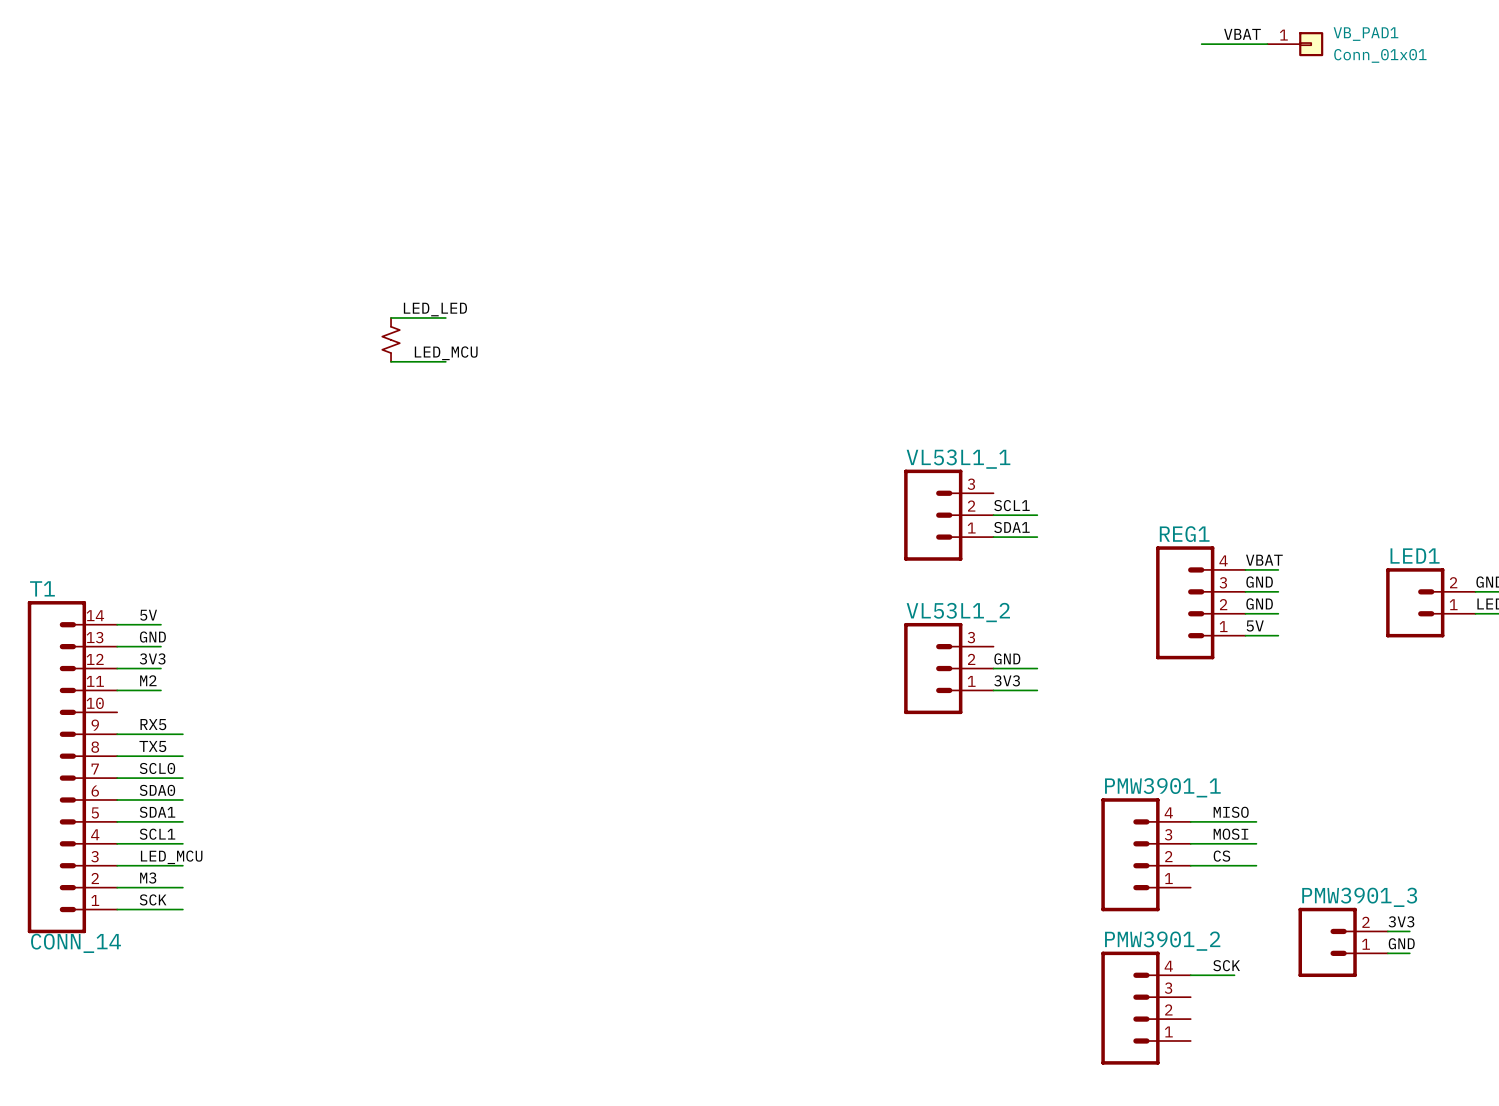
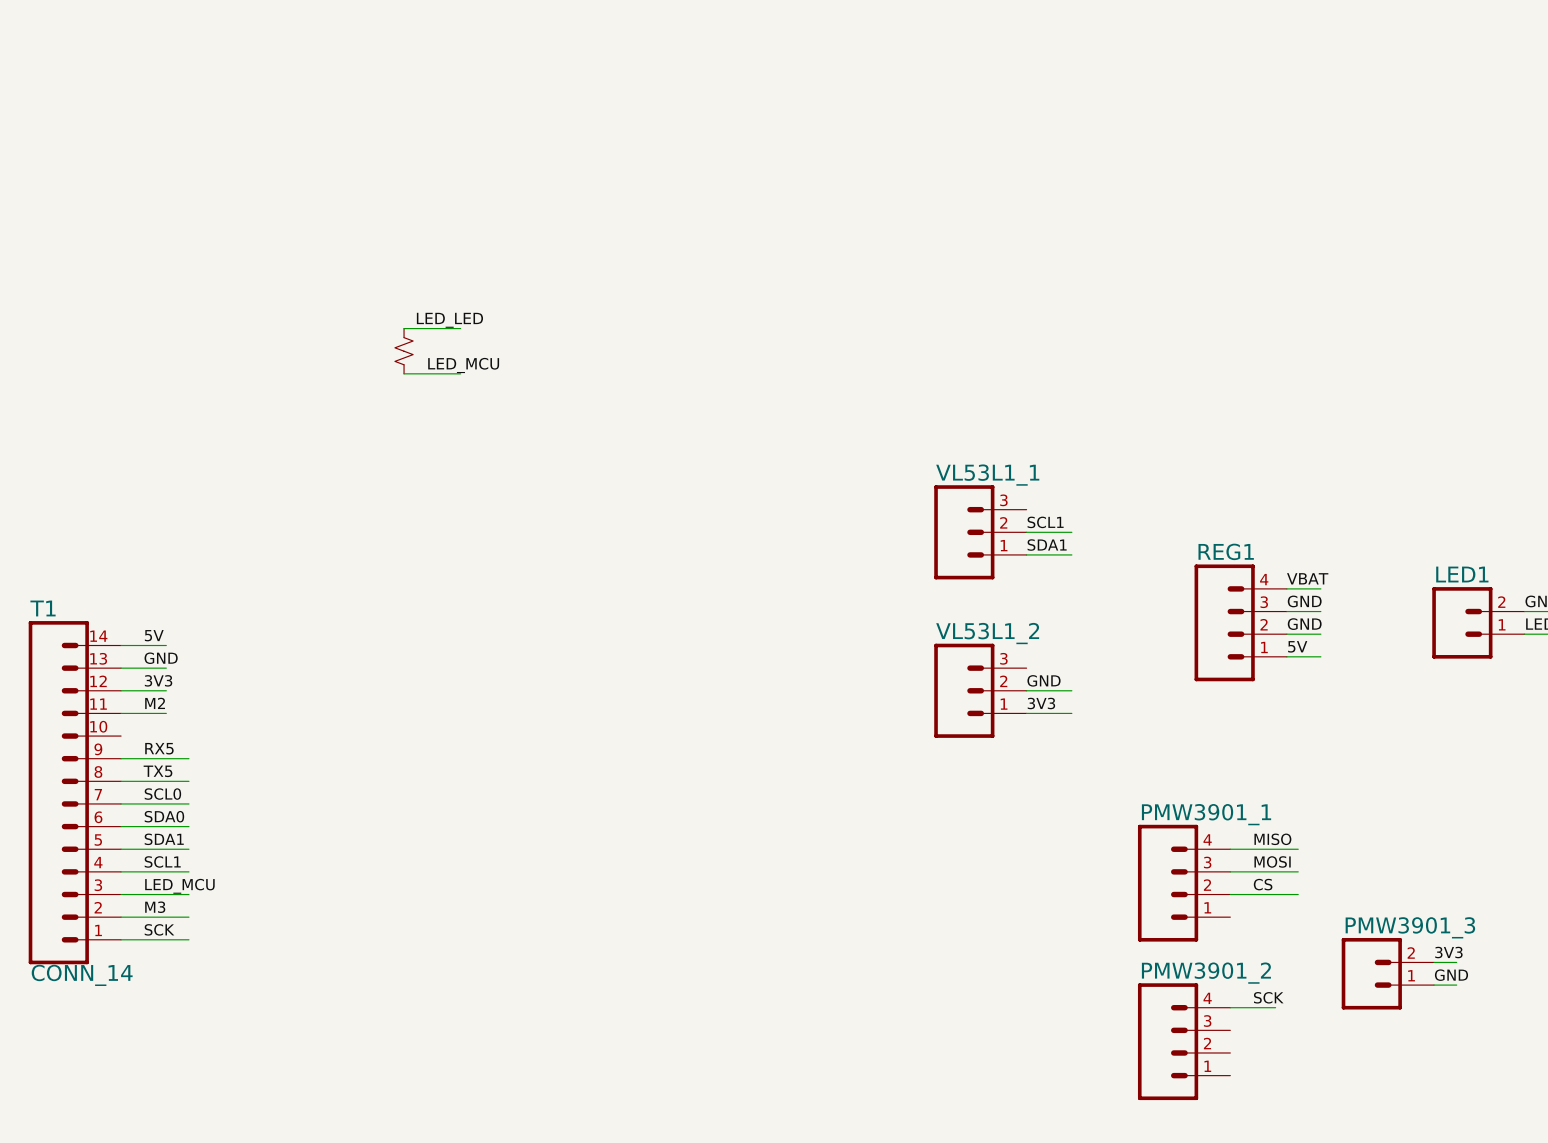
label: VBAT (1242, 34) -> none
wire: (1201, 44) (1267, 44) -> none
VB_PAD1: Conn_01x01 (1295, 44) -> none

